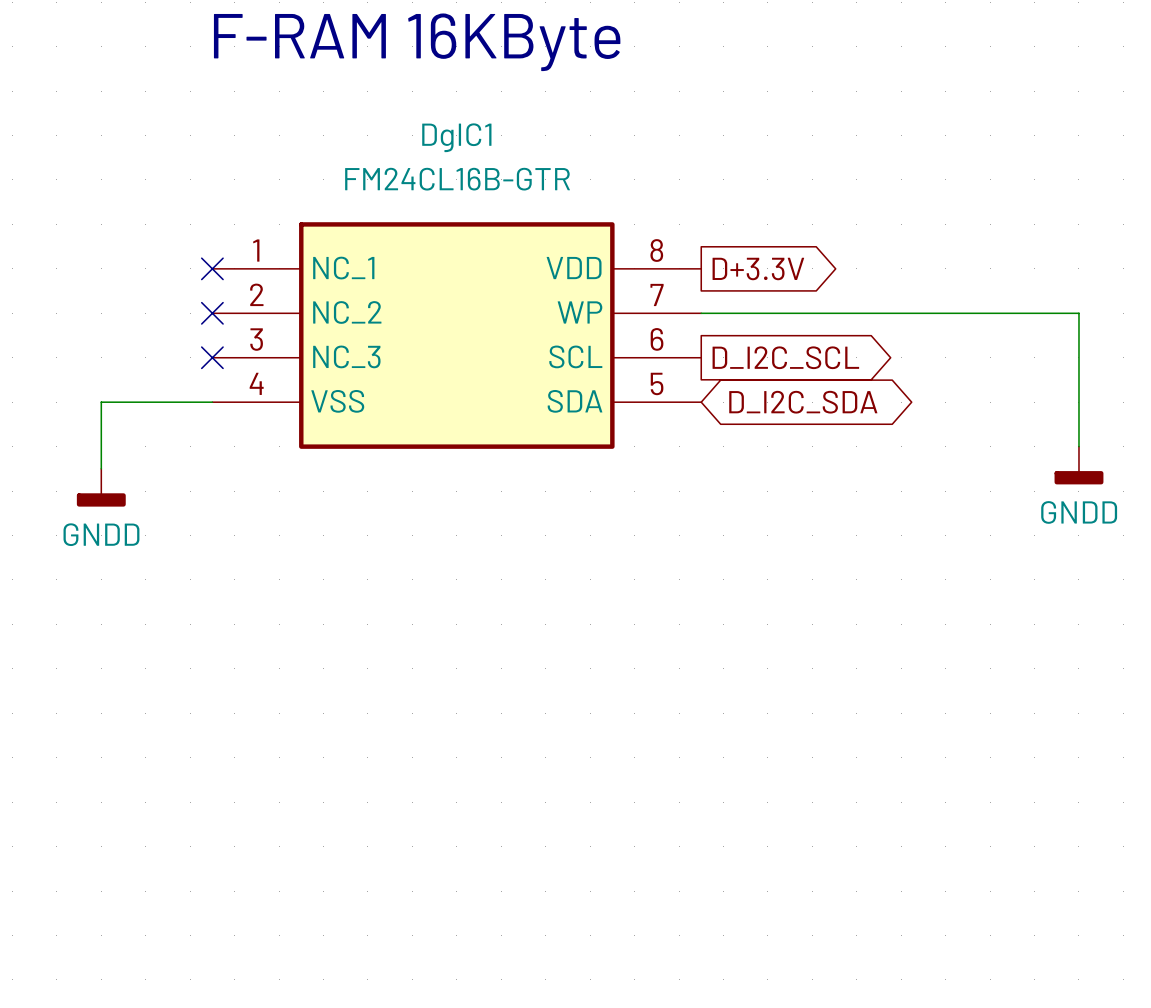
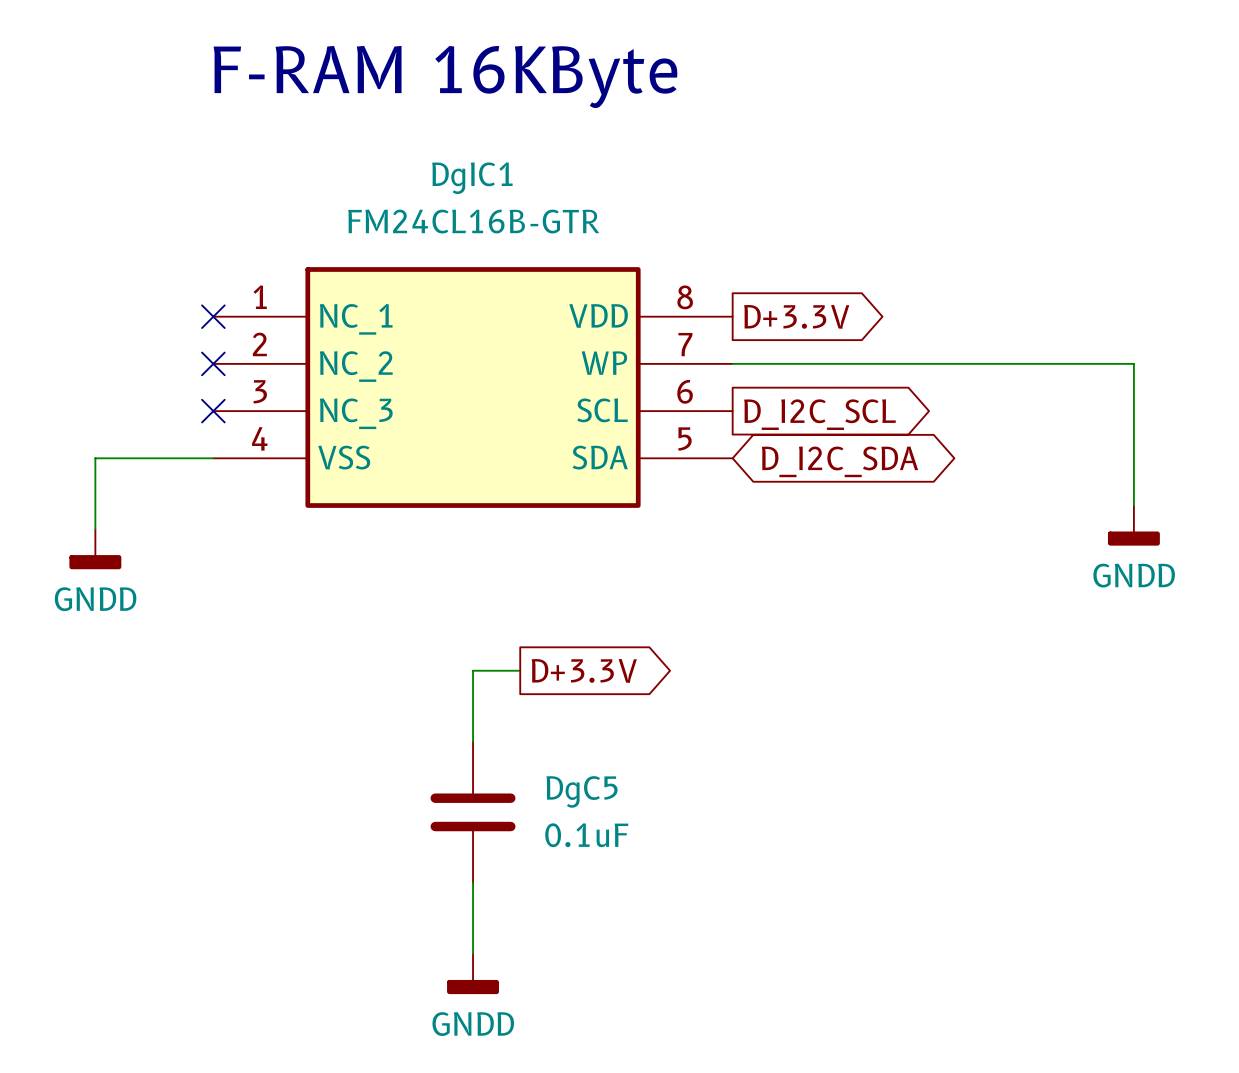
wire: none -> (520, 670) (473, 670) (473, 741)
global label: none -> D+3.3V (584, 670)
DgC5: none -> 0.1uF (473, 812)
wire: none -> (473, 883) (473, 953)
power symbol: none -> GNDD (473, 974)

